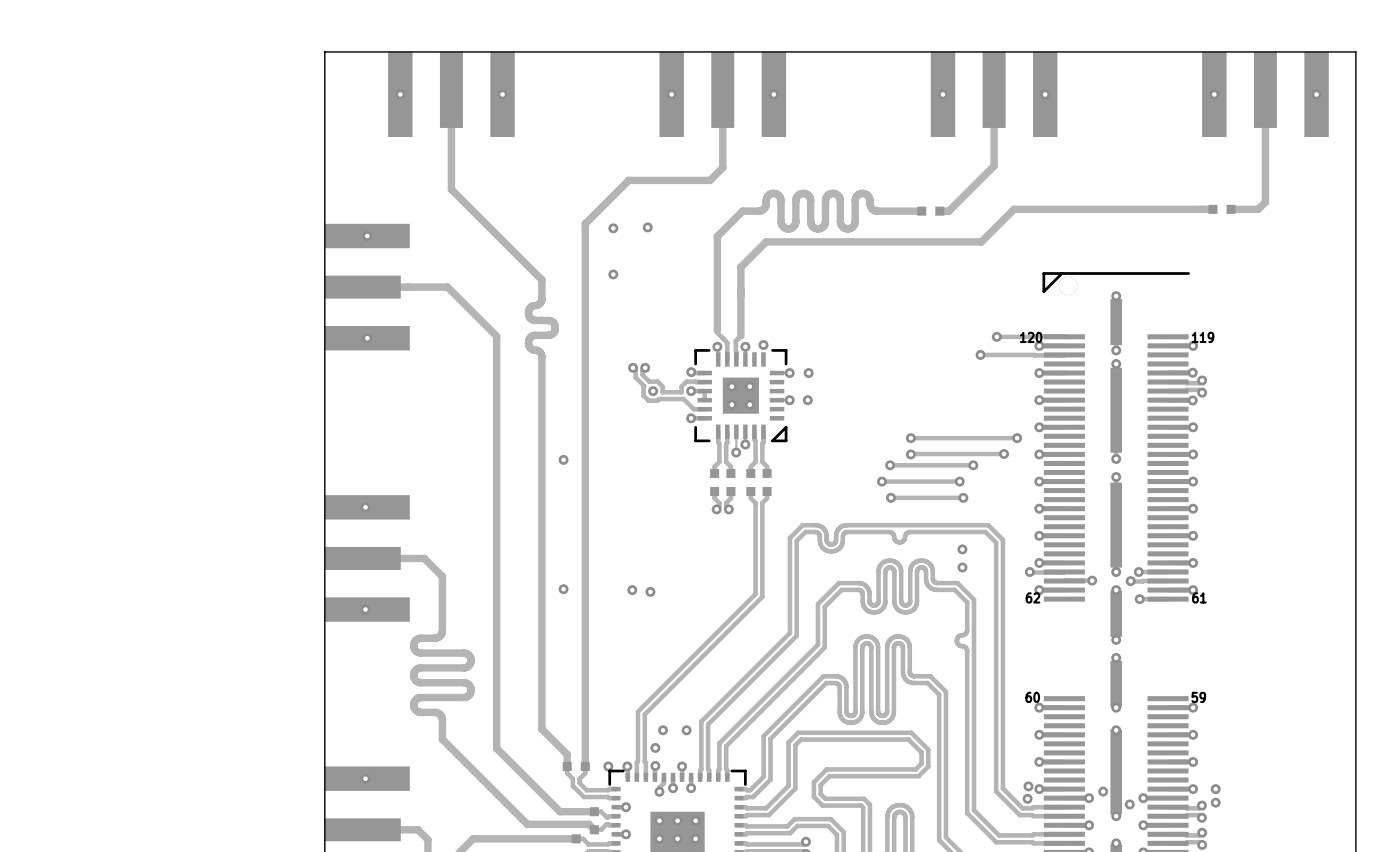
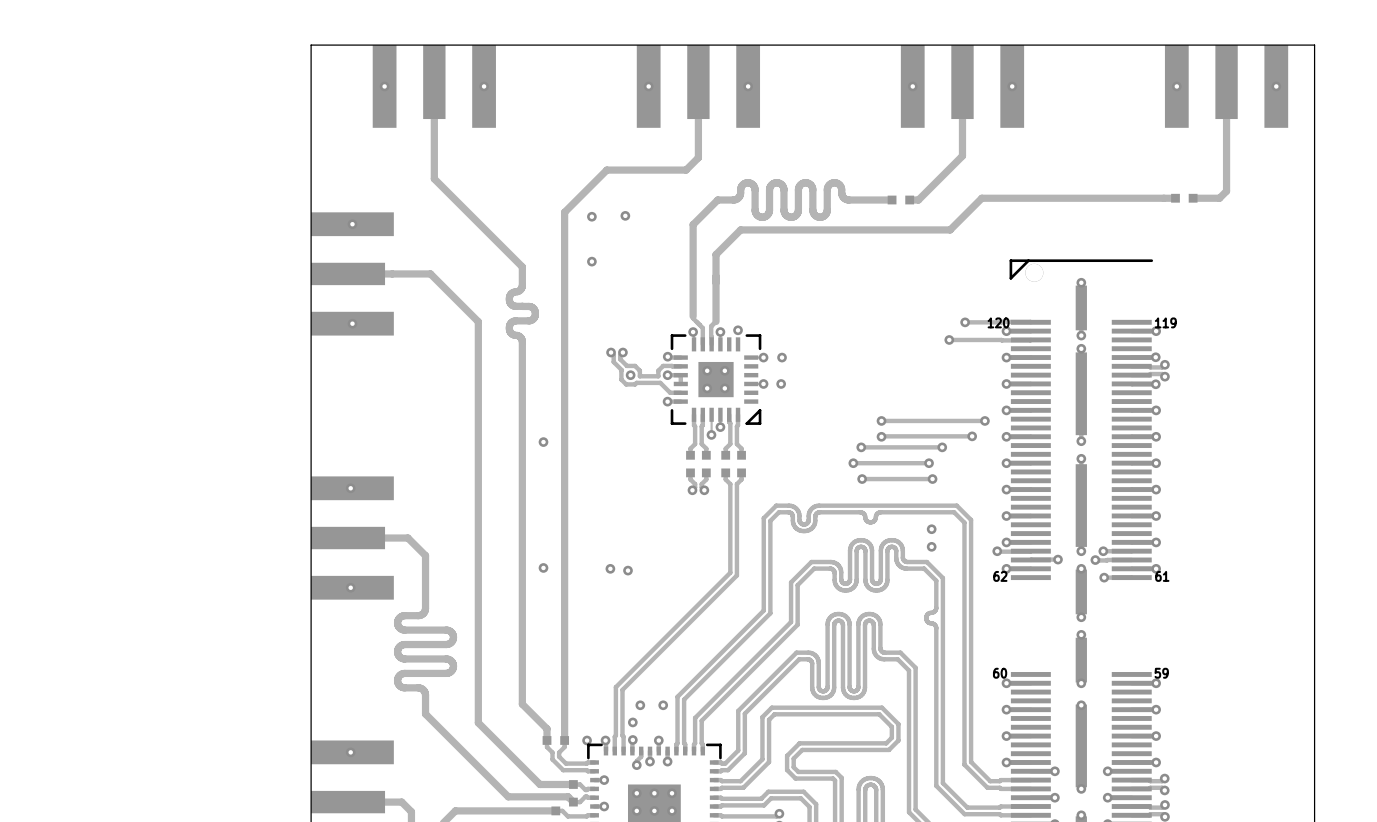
via: (1028, 786) -> none
via: (1215, 789) -> none
via: (1103, 791) -> none
via: (1027, 798) -> none
via: (1215, 802) -> none
via: (1129, 804) -> none

